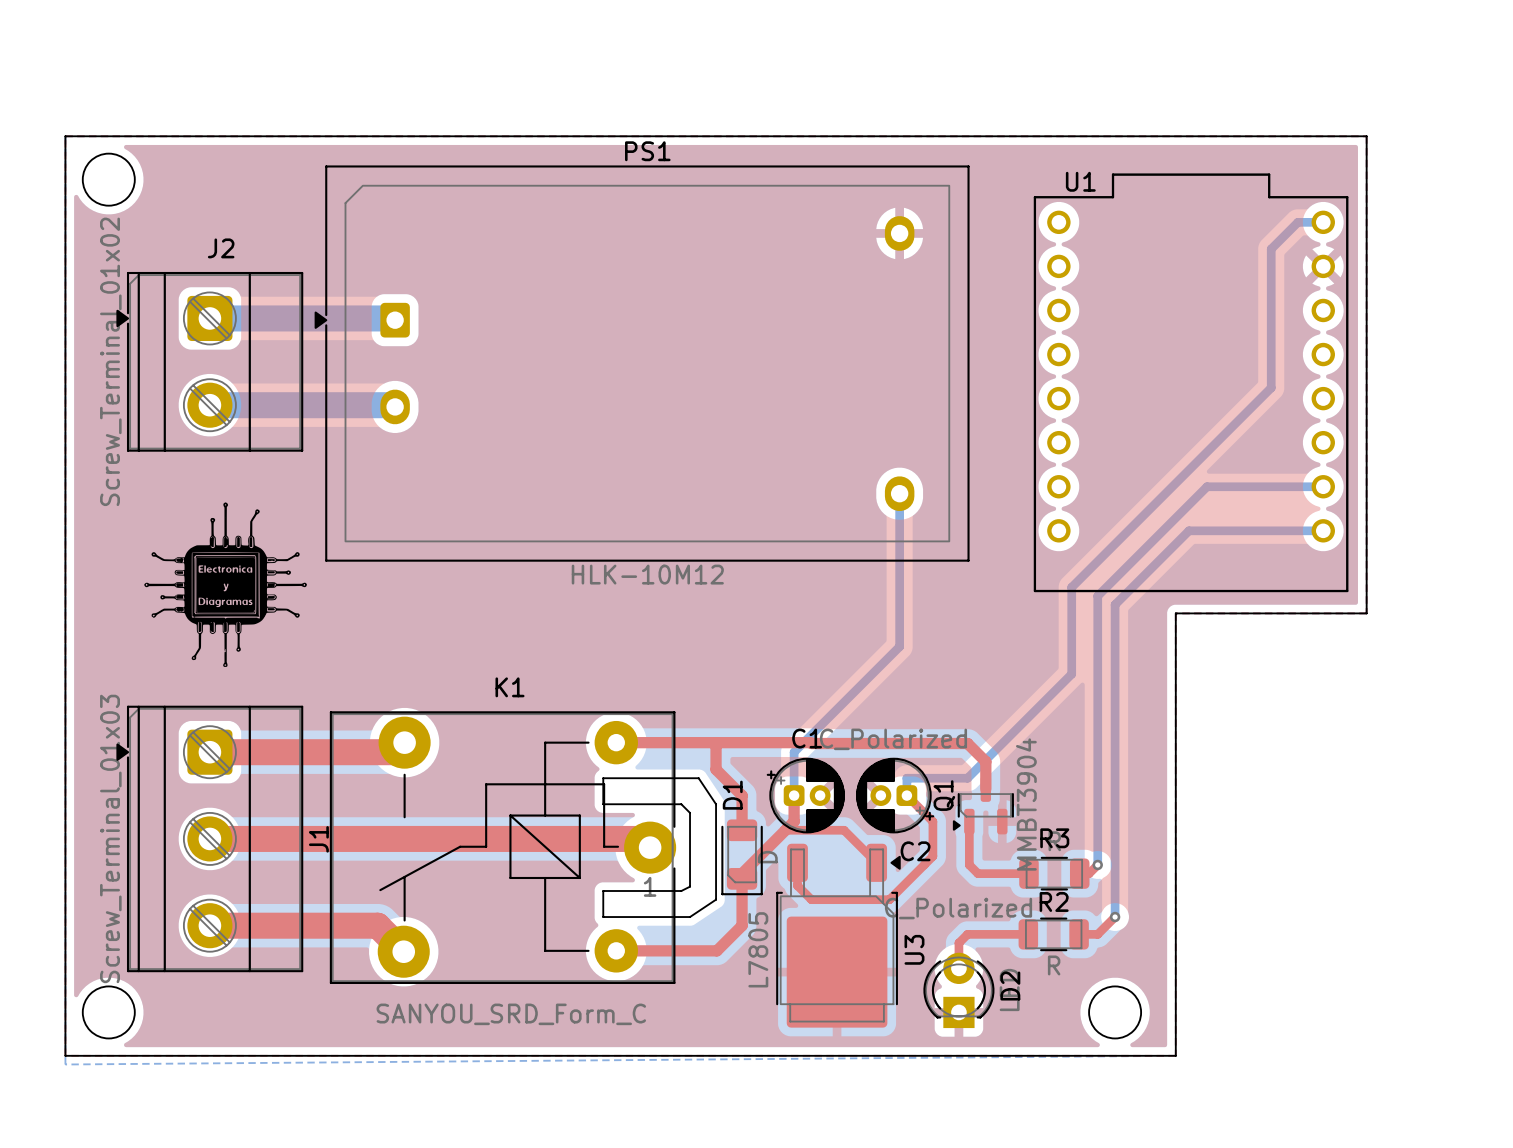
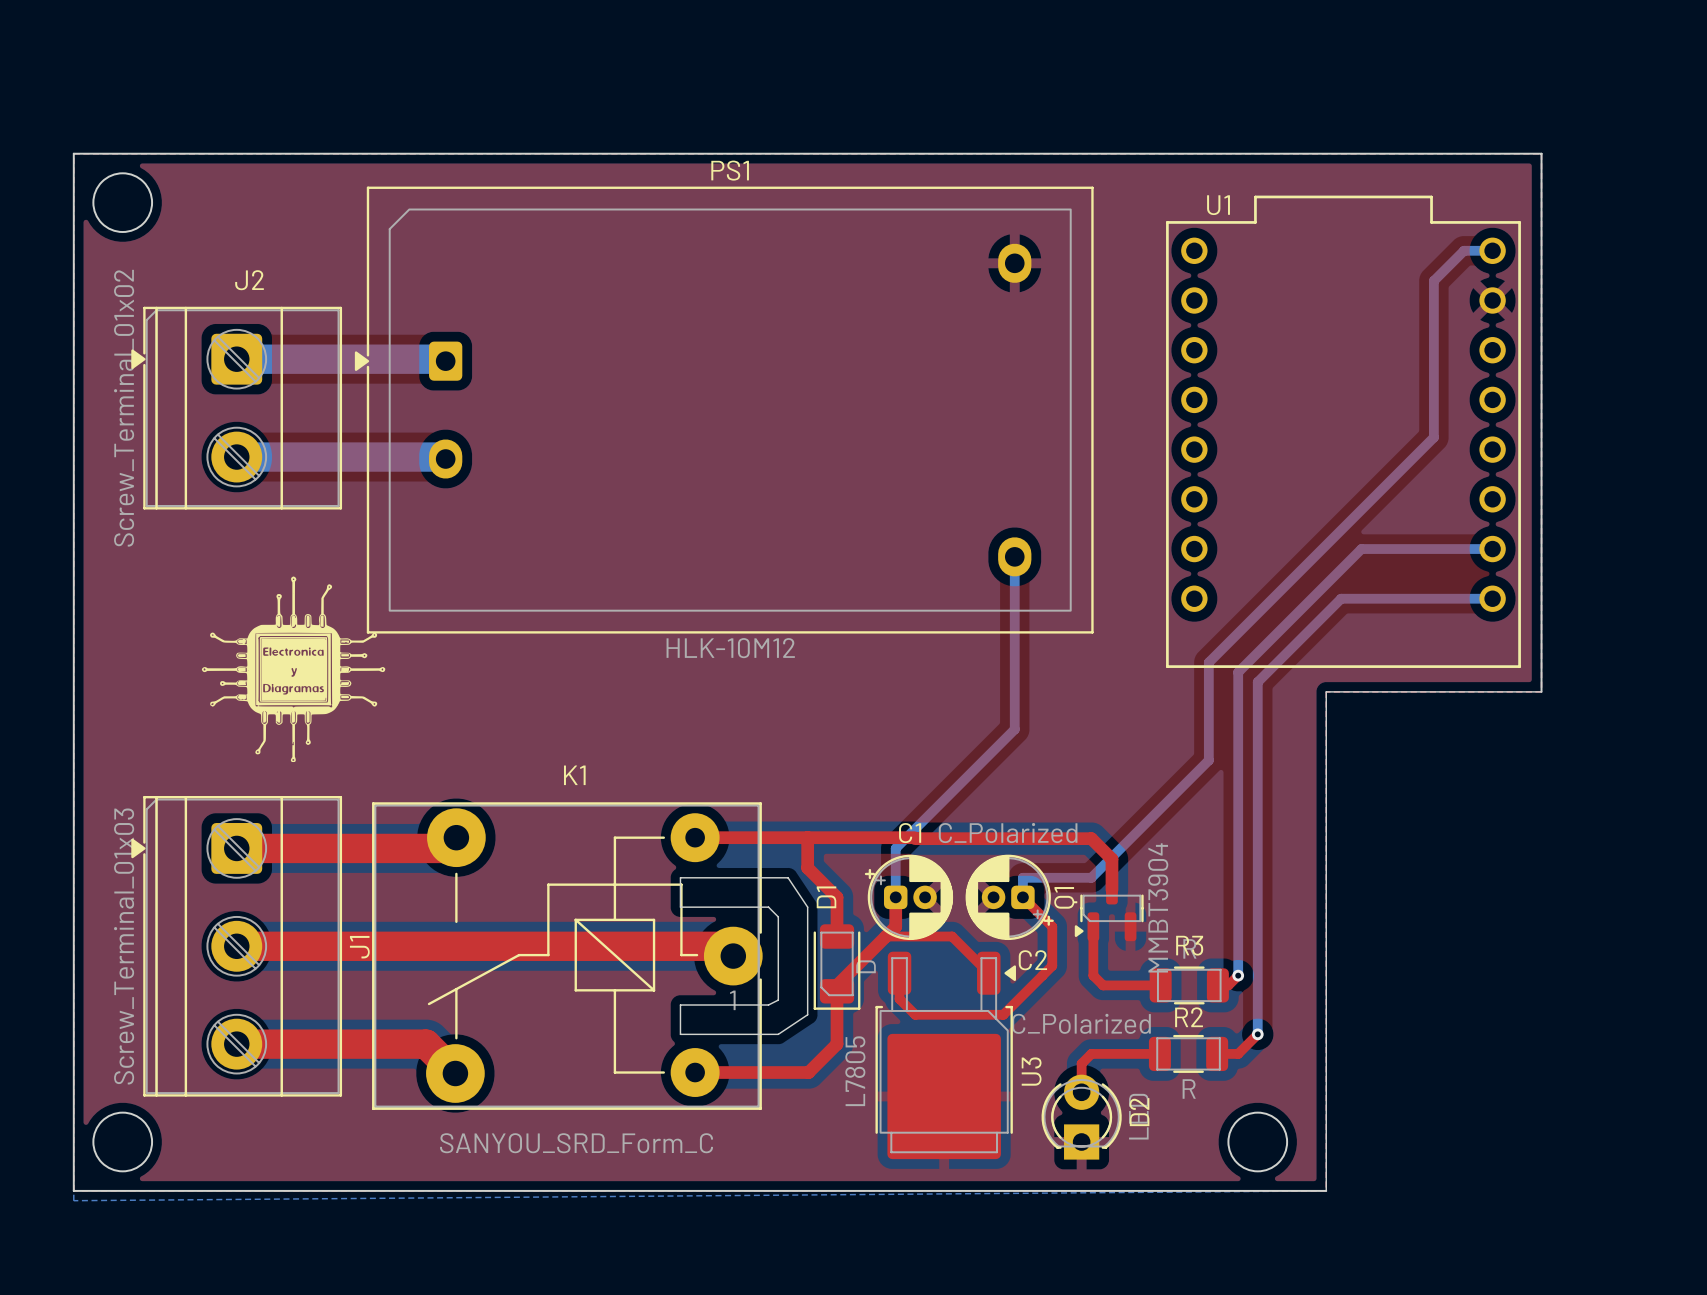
drawing position: (225, 584) -> (293, 669)

